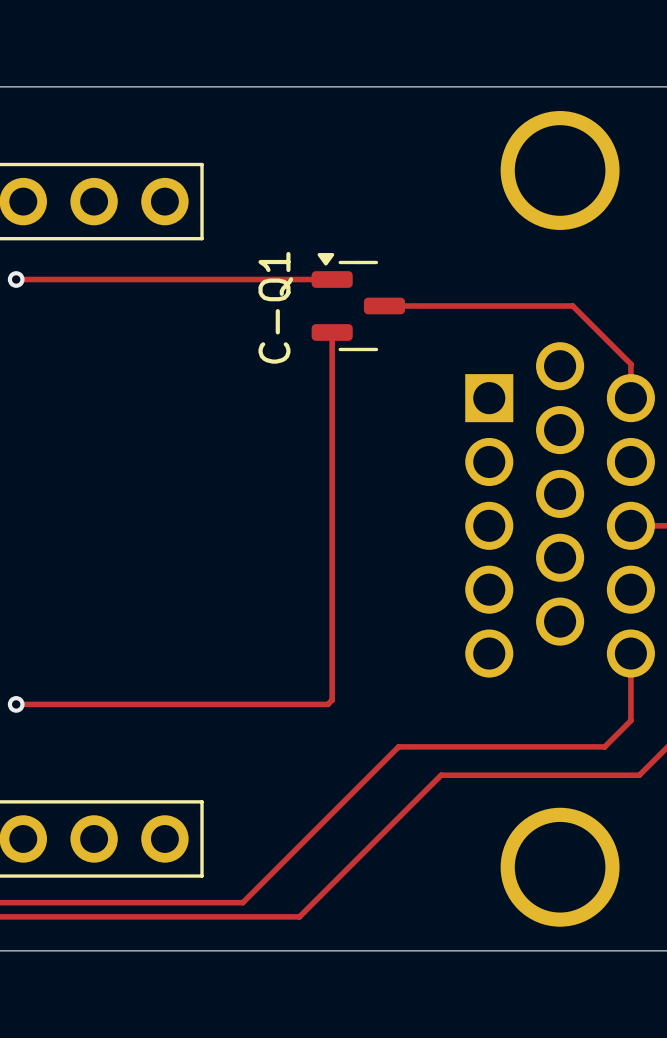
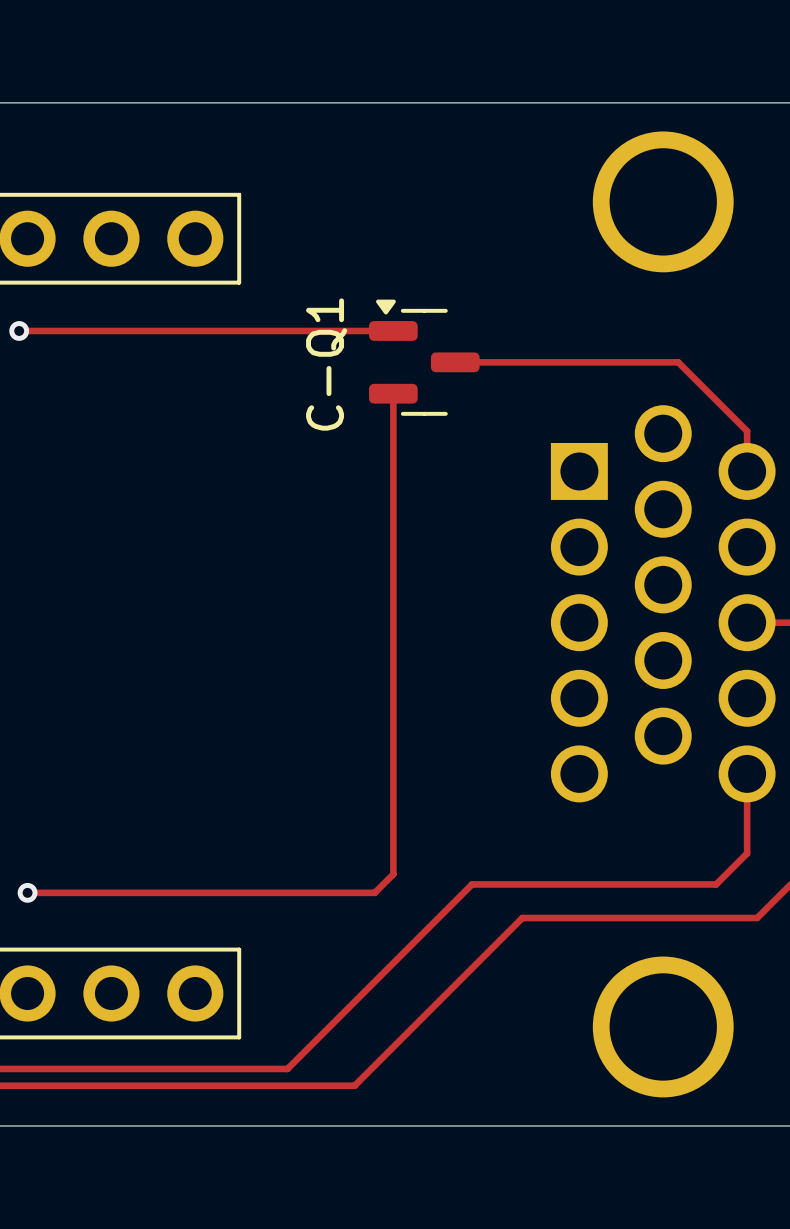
track: (332, 700) (327, 704) (16, 704) -> (393, 828) (393, 874) (374, 892) (27, 892)
via position: (16, 704) -> (27, 892)

